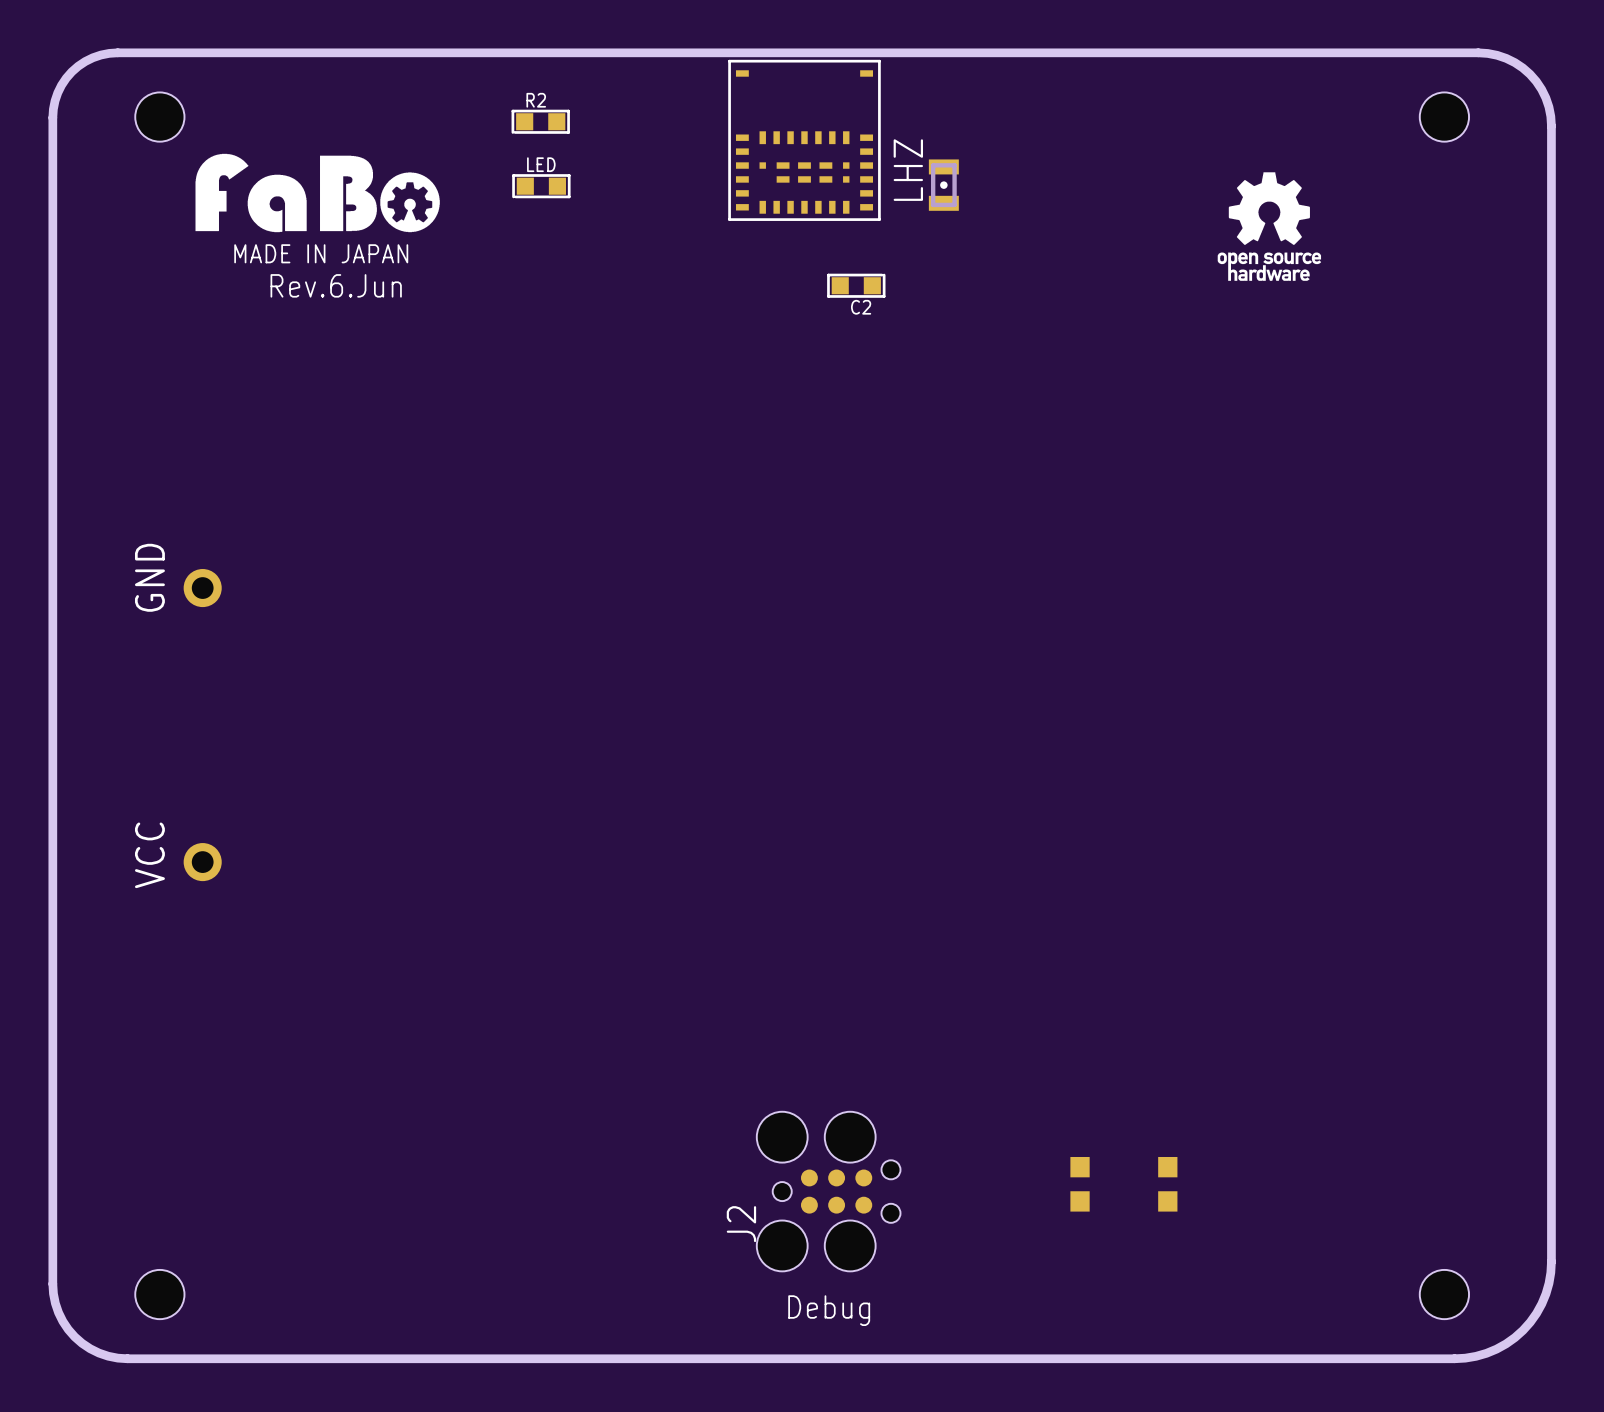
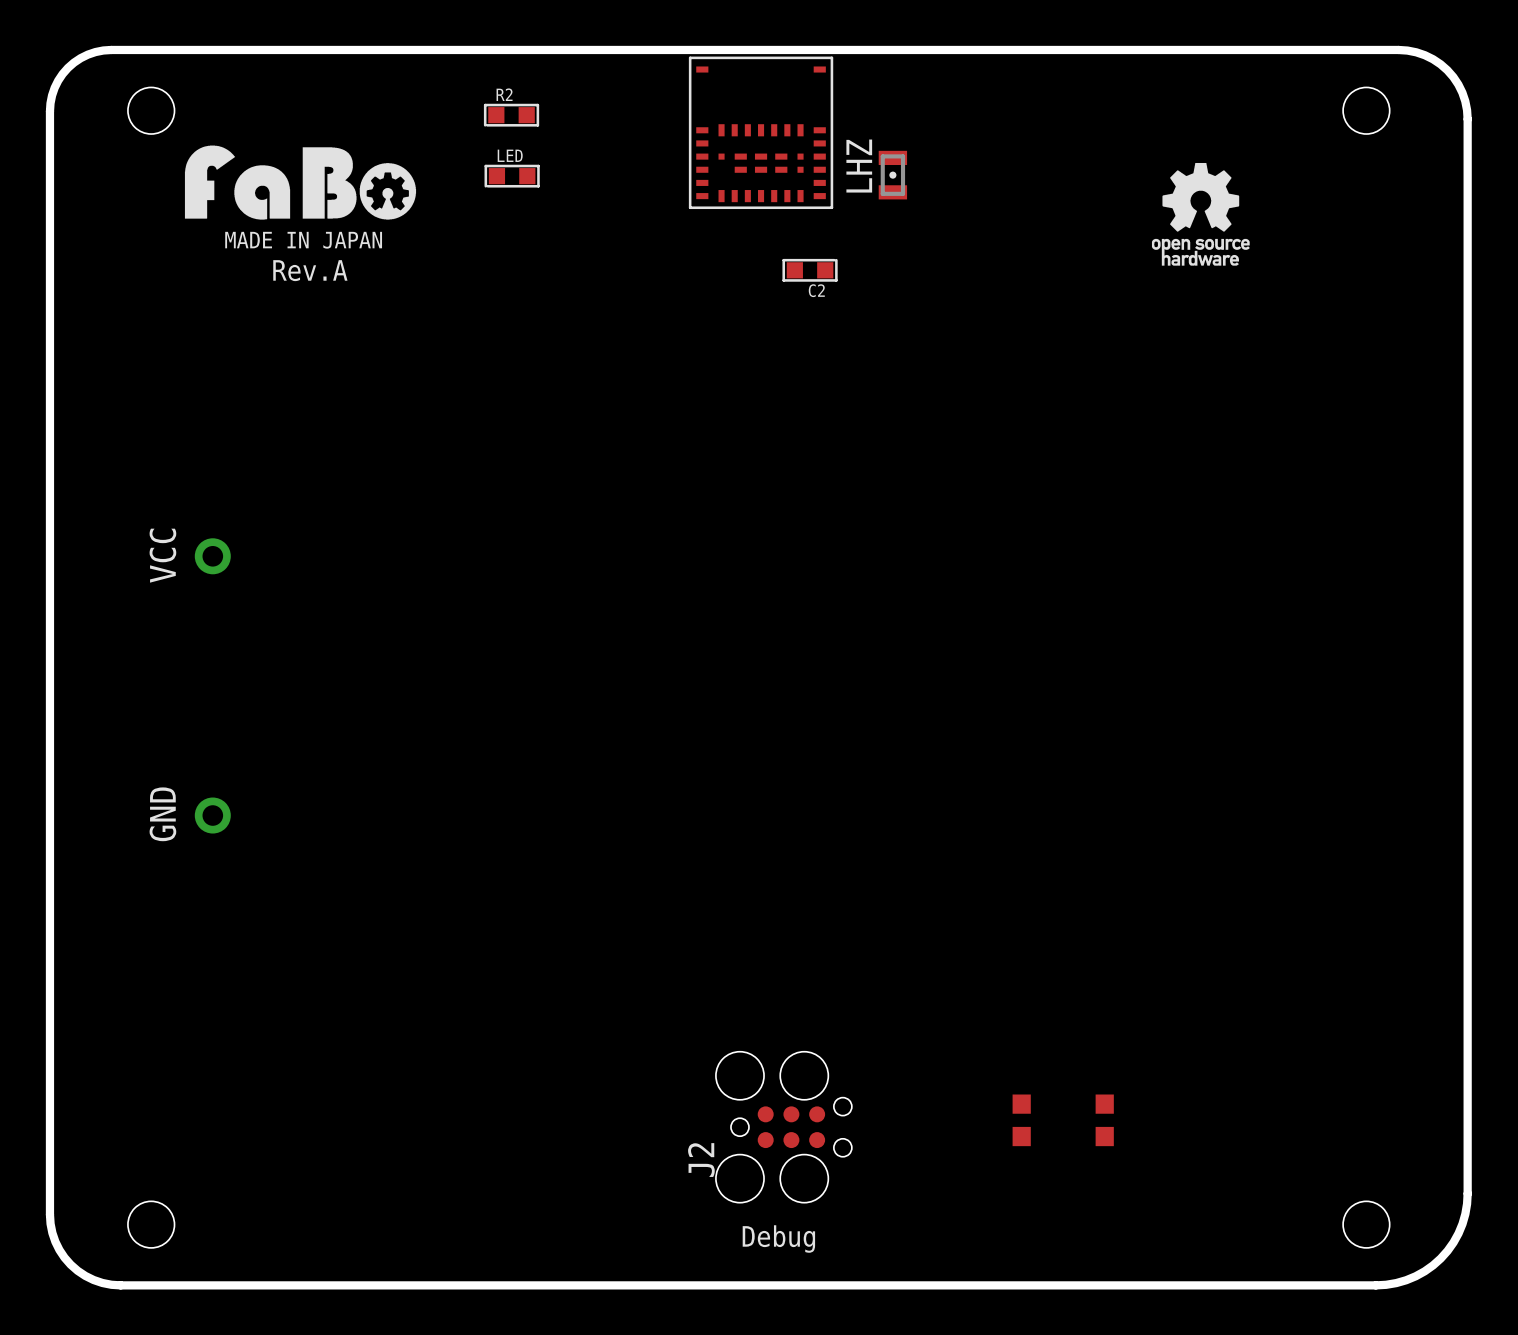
text: Rev.6.Jun (336, 285) -> Rev.A (310, 270)
GND position: (202, 588) -> (212, 815)
VCC position: (202, 862) -> (212, 556)

